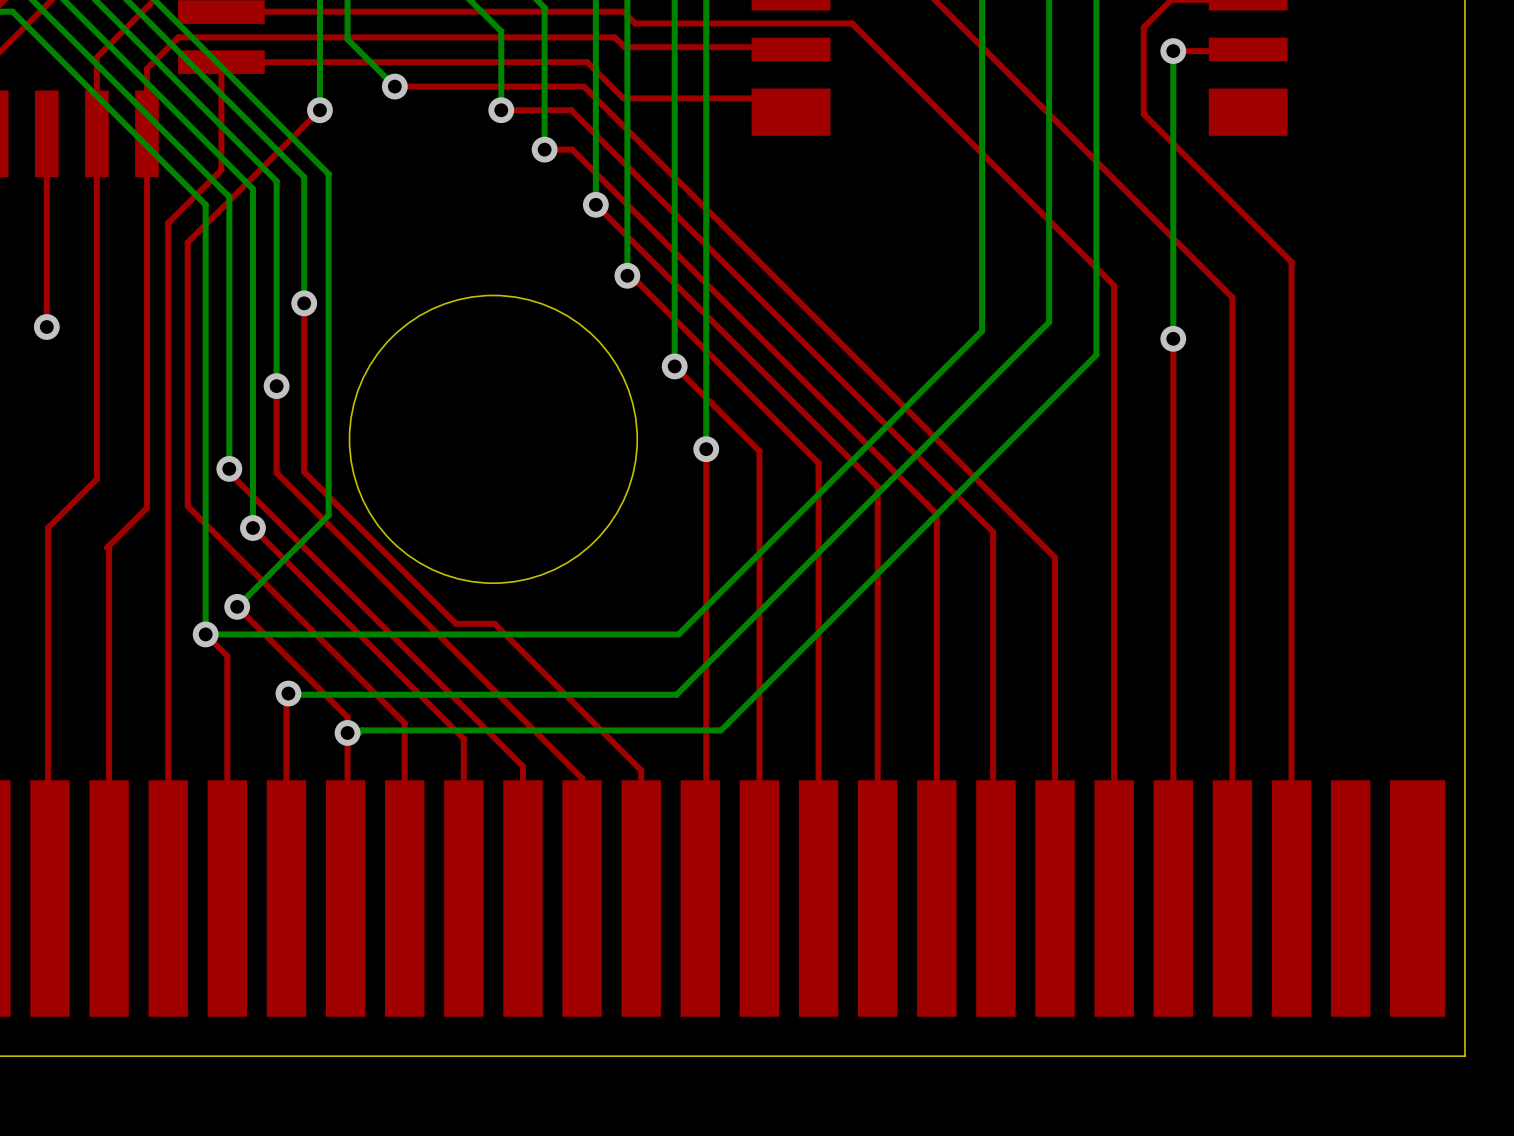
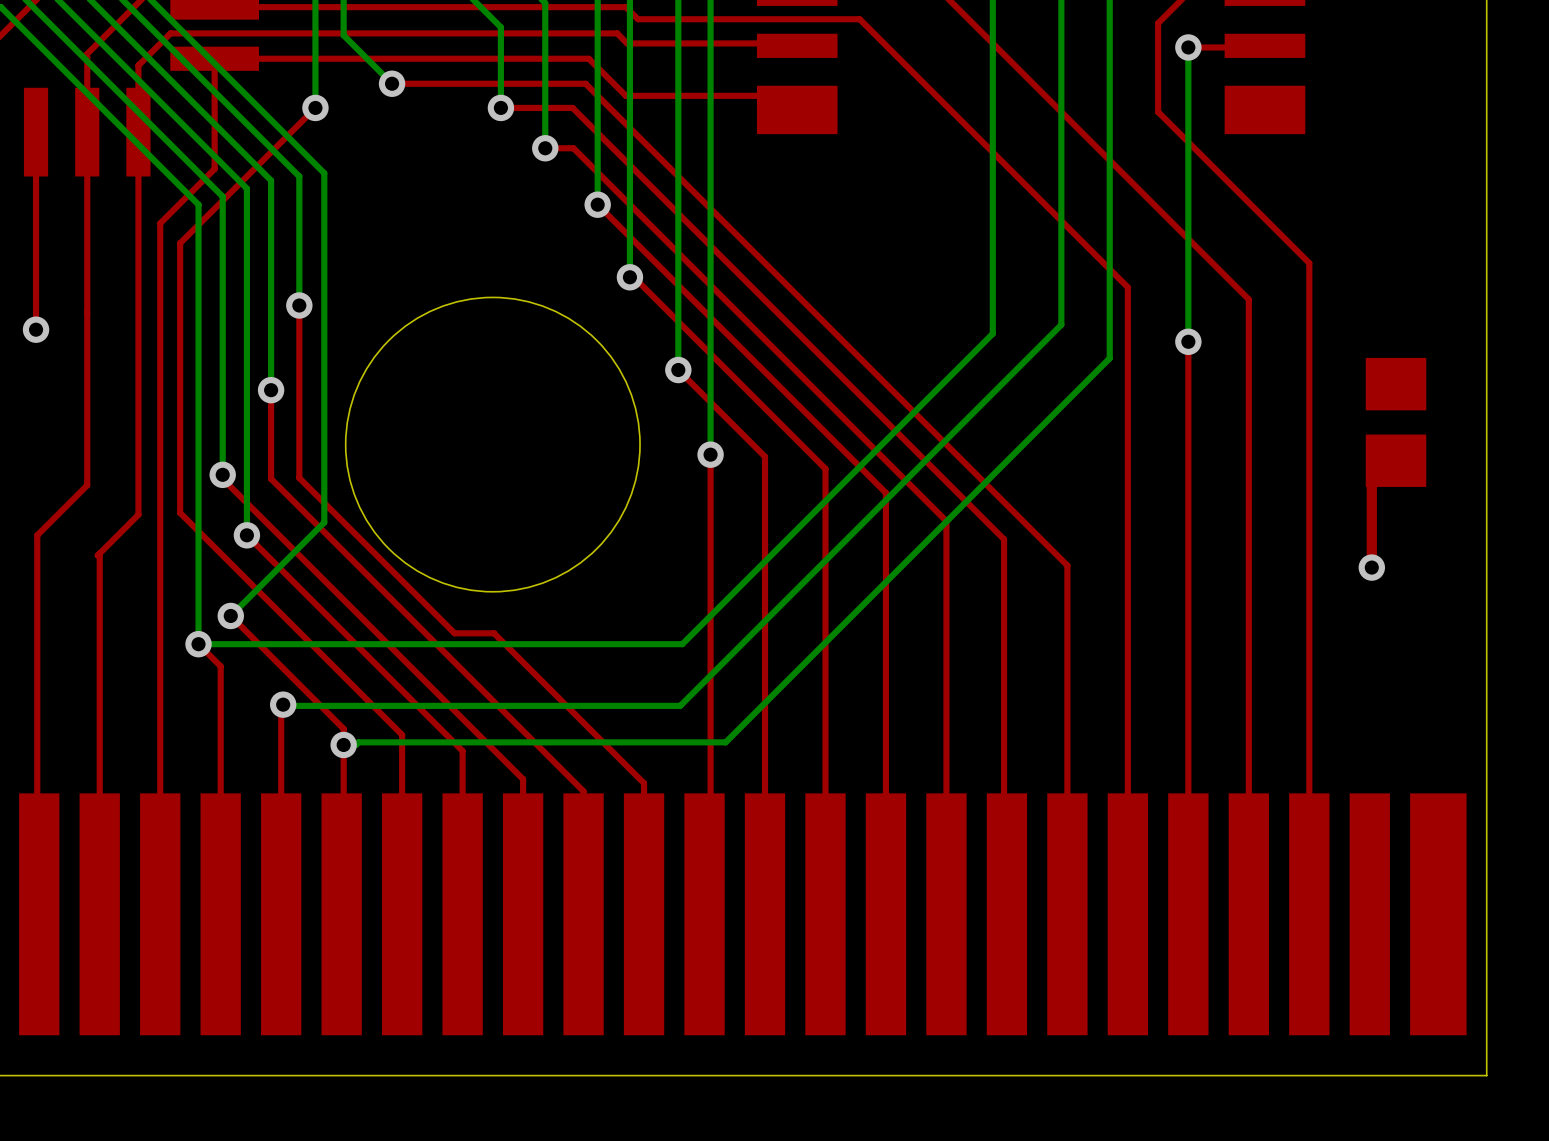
part: none -> (1396, 422)
top track: none -> (1396, 460) (1371, 484) (1371, 567)
via: none -> (1371, 567)

